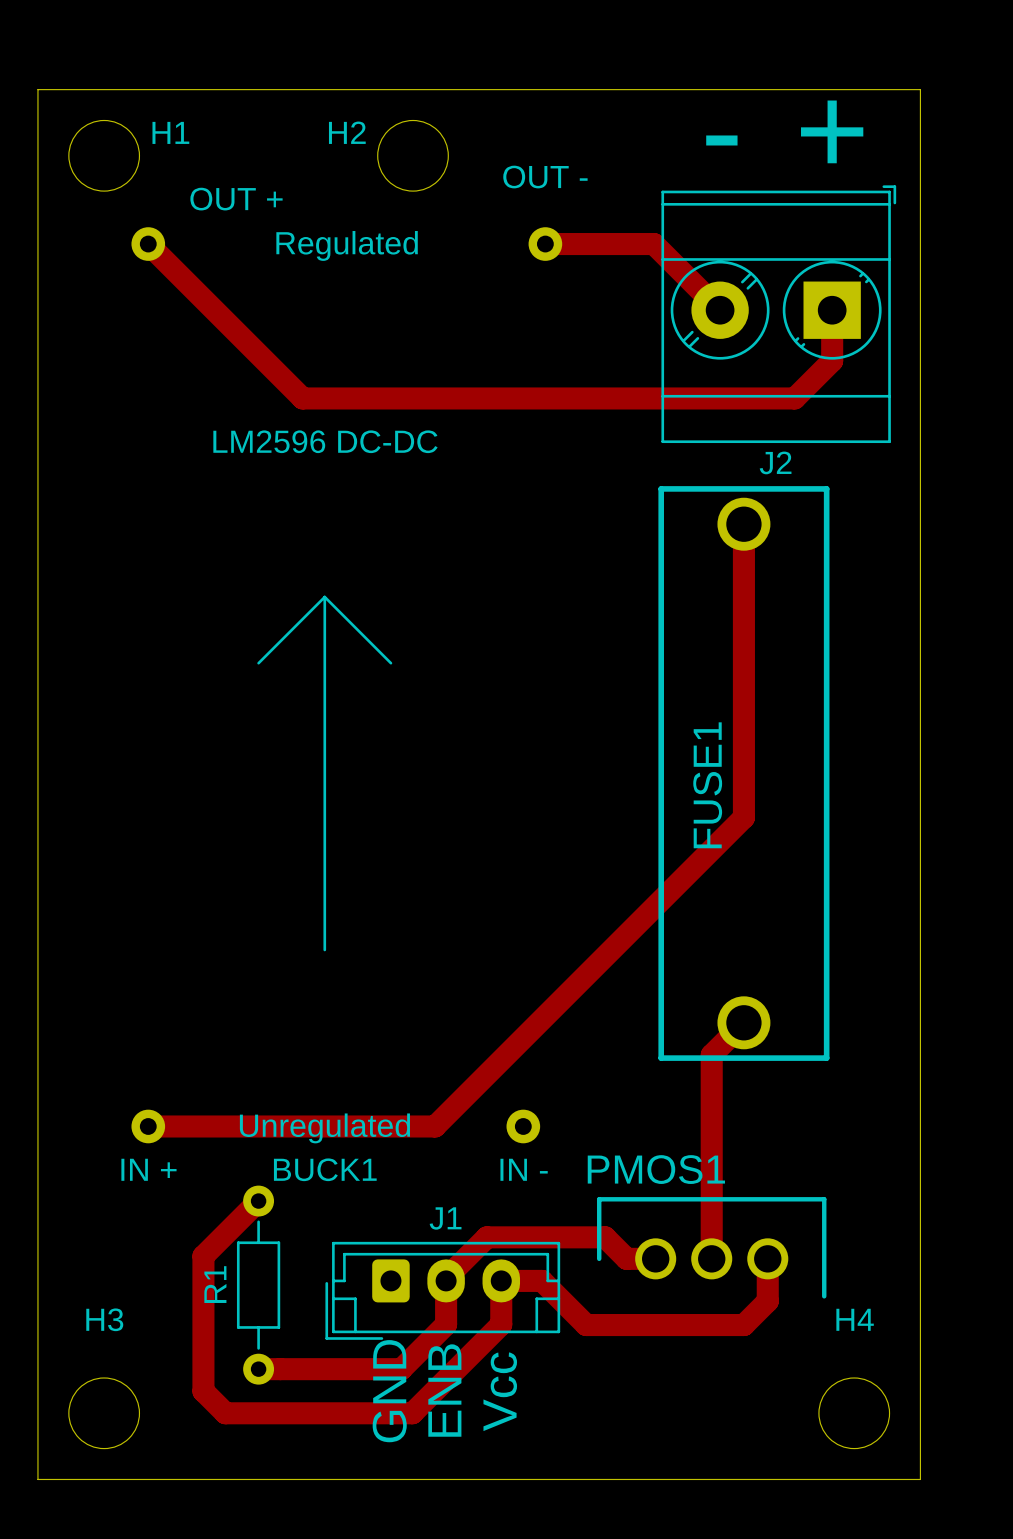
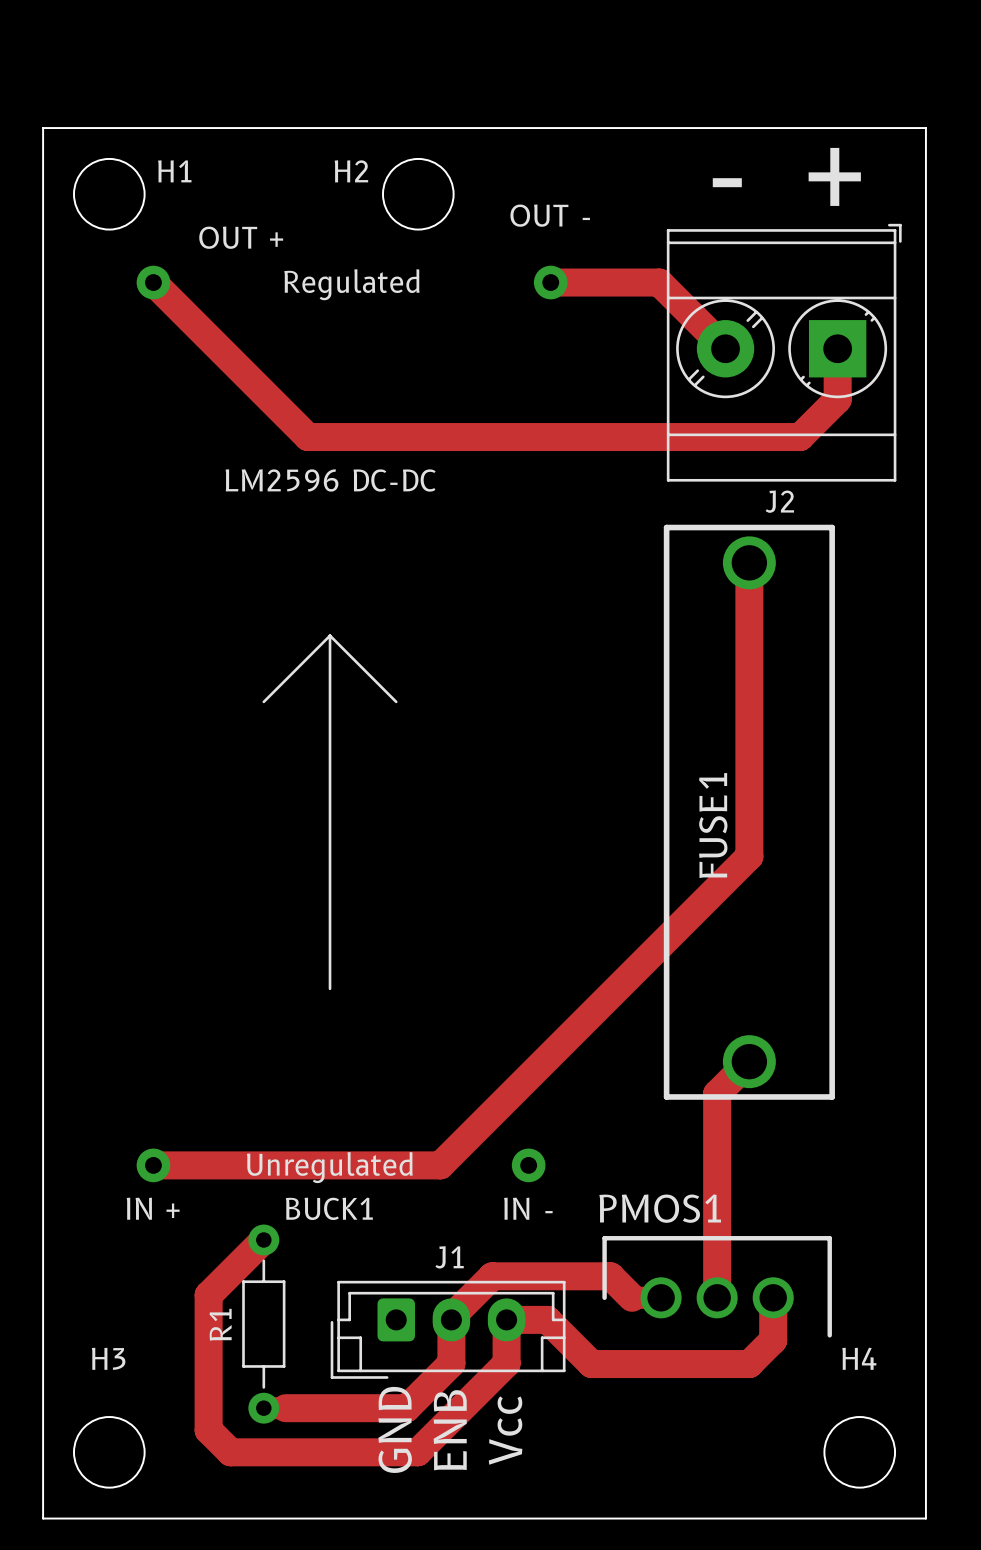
track width: thin (148, 244) (302, 398) (794, 398) (832, 360) (832, 310) -> thick (153, 282) (307, 437) (800, 437) (837, 399) (837, 348)
track width: thin (545, 244) (653, 244) (720, 310) -> thick (550, 282) (659, 282) (725, 348)
track width: thin (743, 524) (743, 817) (435, 1126) (148, 1126) -> thick (749, 562) (749, 856) (440, 1165) (153, 1165)
track width: thin (743, 1022) (711, 1055) (711, 1258) -> thick (749, 1061) (717, 1093) (717, 1297)
track width: thin (258, 1201) (203, 1256) (203, 1391) (225, 1413) (412, 1413) (501, 1324) (501, 1280) (542, 1280) (586, 1325) (743, 1325) (767, 1301) (767, 1258) -> thick (263, 1239) (208, 1295) (208, 1430) (230, 1452) (417, 1452) (506, 1363) (506, 1319) (547, 1319) (591, 1364) (749, 1364) (773, 1340) (773, 1297)
track width: thin (626, 1258) (605, 1237) (486, 1237) (446, 1278) -> thick (632, 1297) (610, 1276) (492, 1276) (451, 1317)
track width: thin (446, 1280) (446, 1324) (401, 1369) (280, 1369) -> thick (451, 1319) (451, 1363) (406, 1408) (285, 1408)

